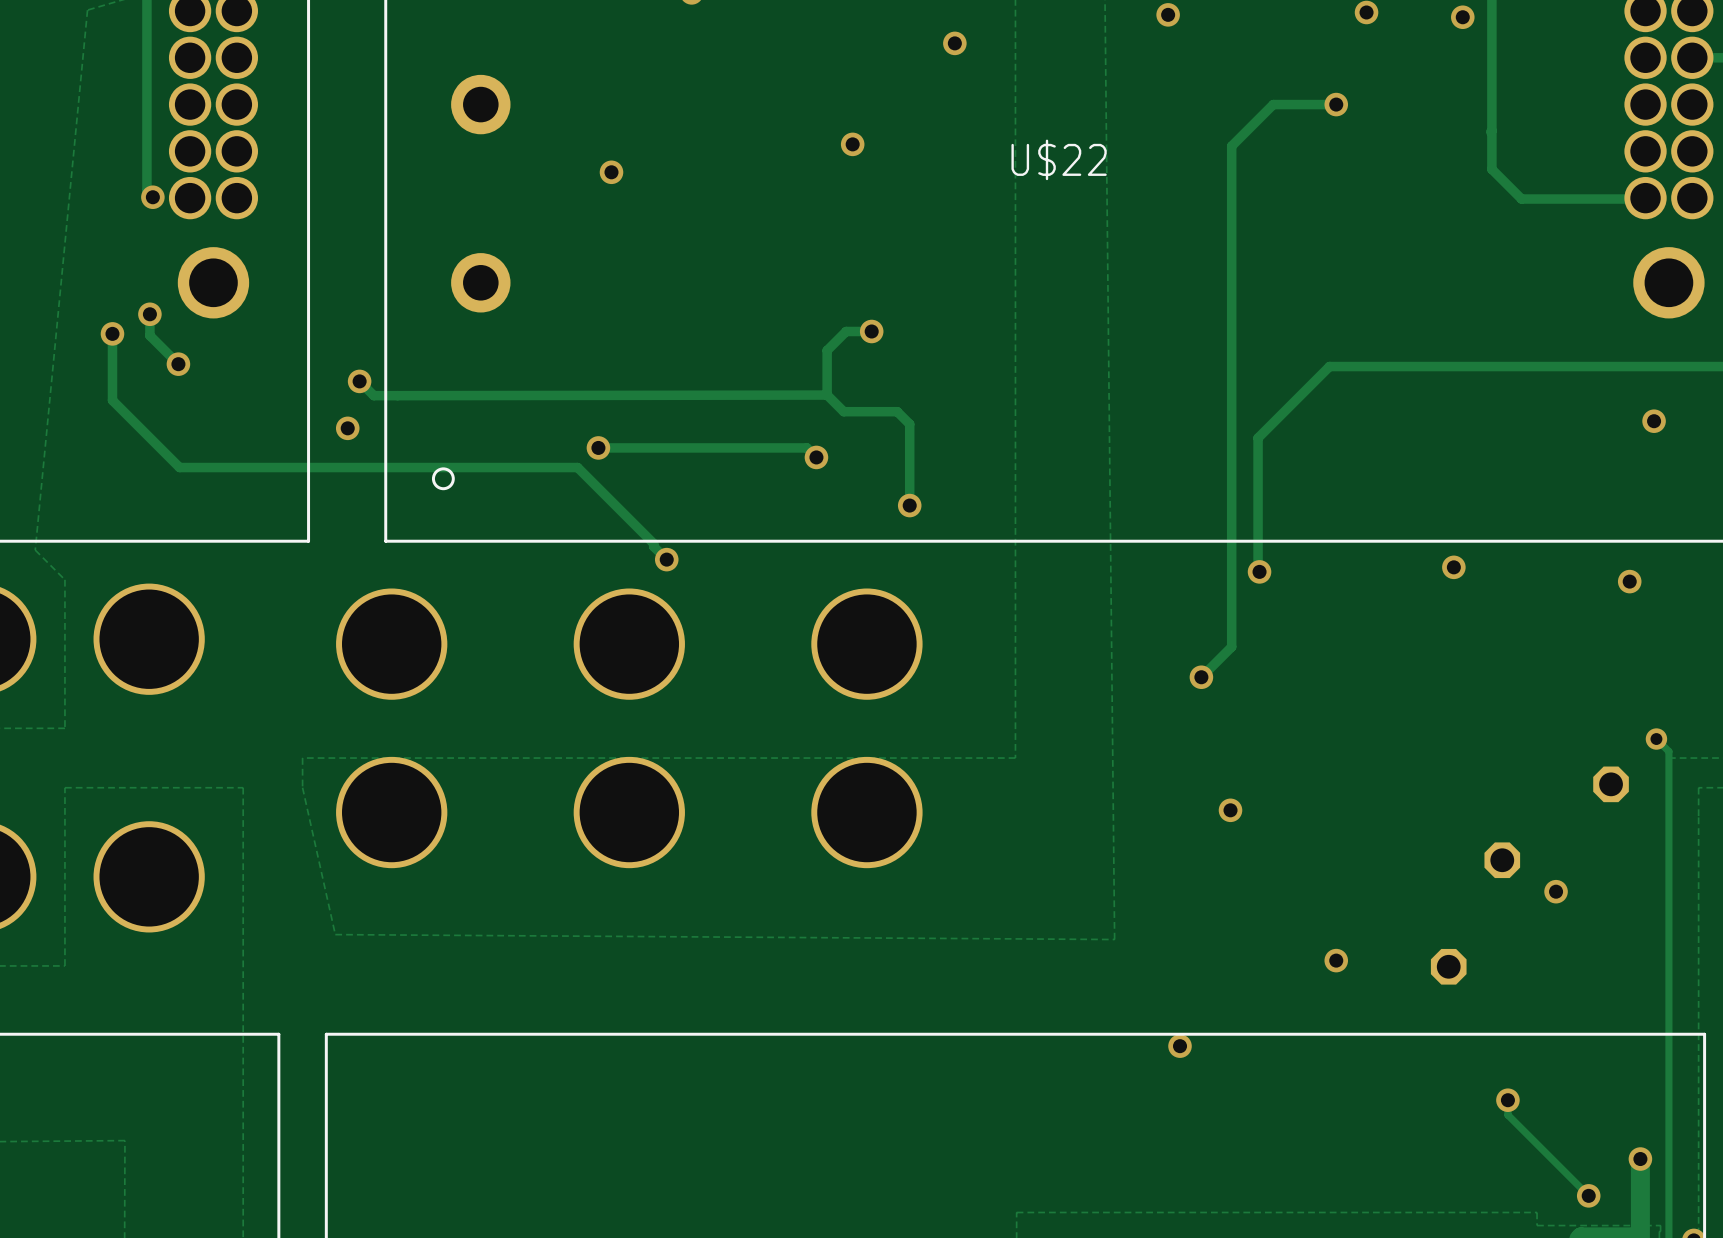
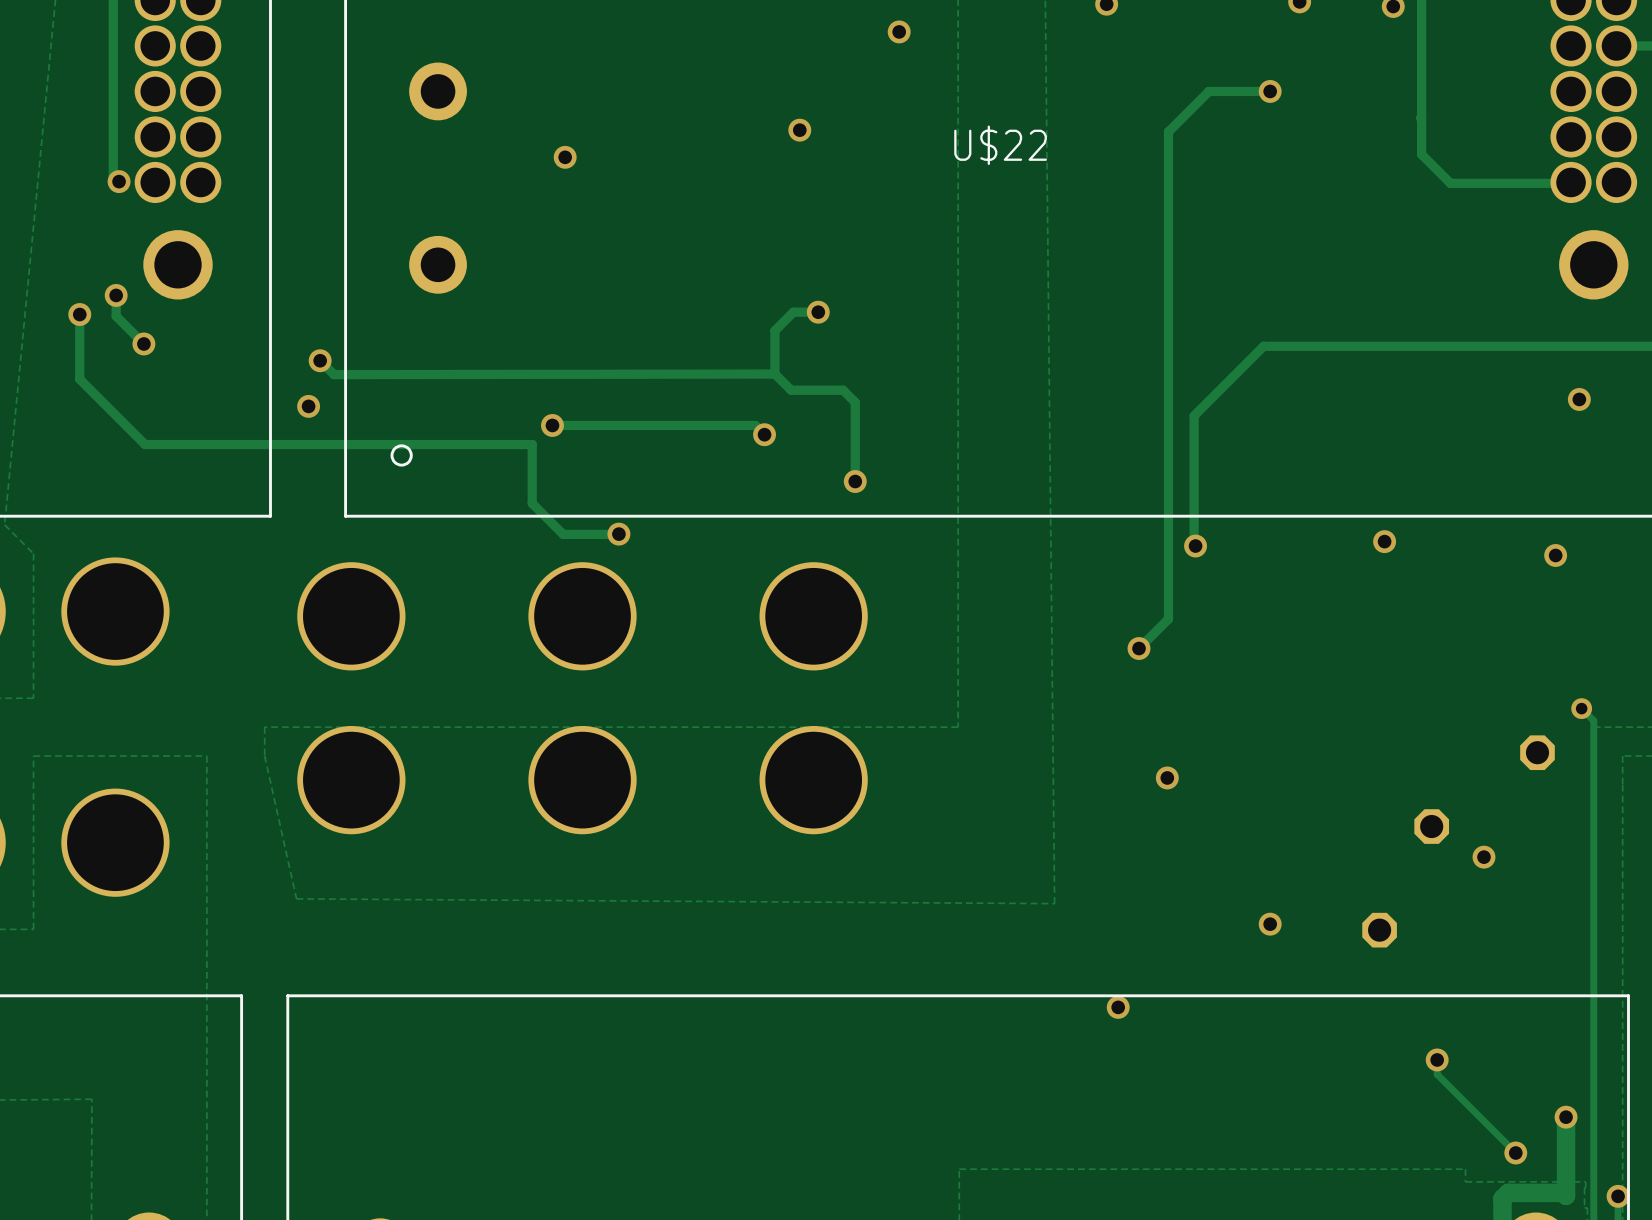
track: (577, 467) (653, 543) (653, 546) (666, 559) -> (532, 444) (532, 503) (563, 534) (618, 534)

